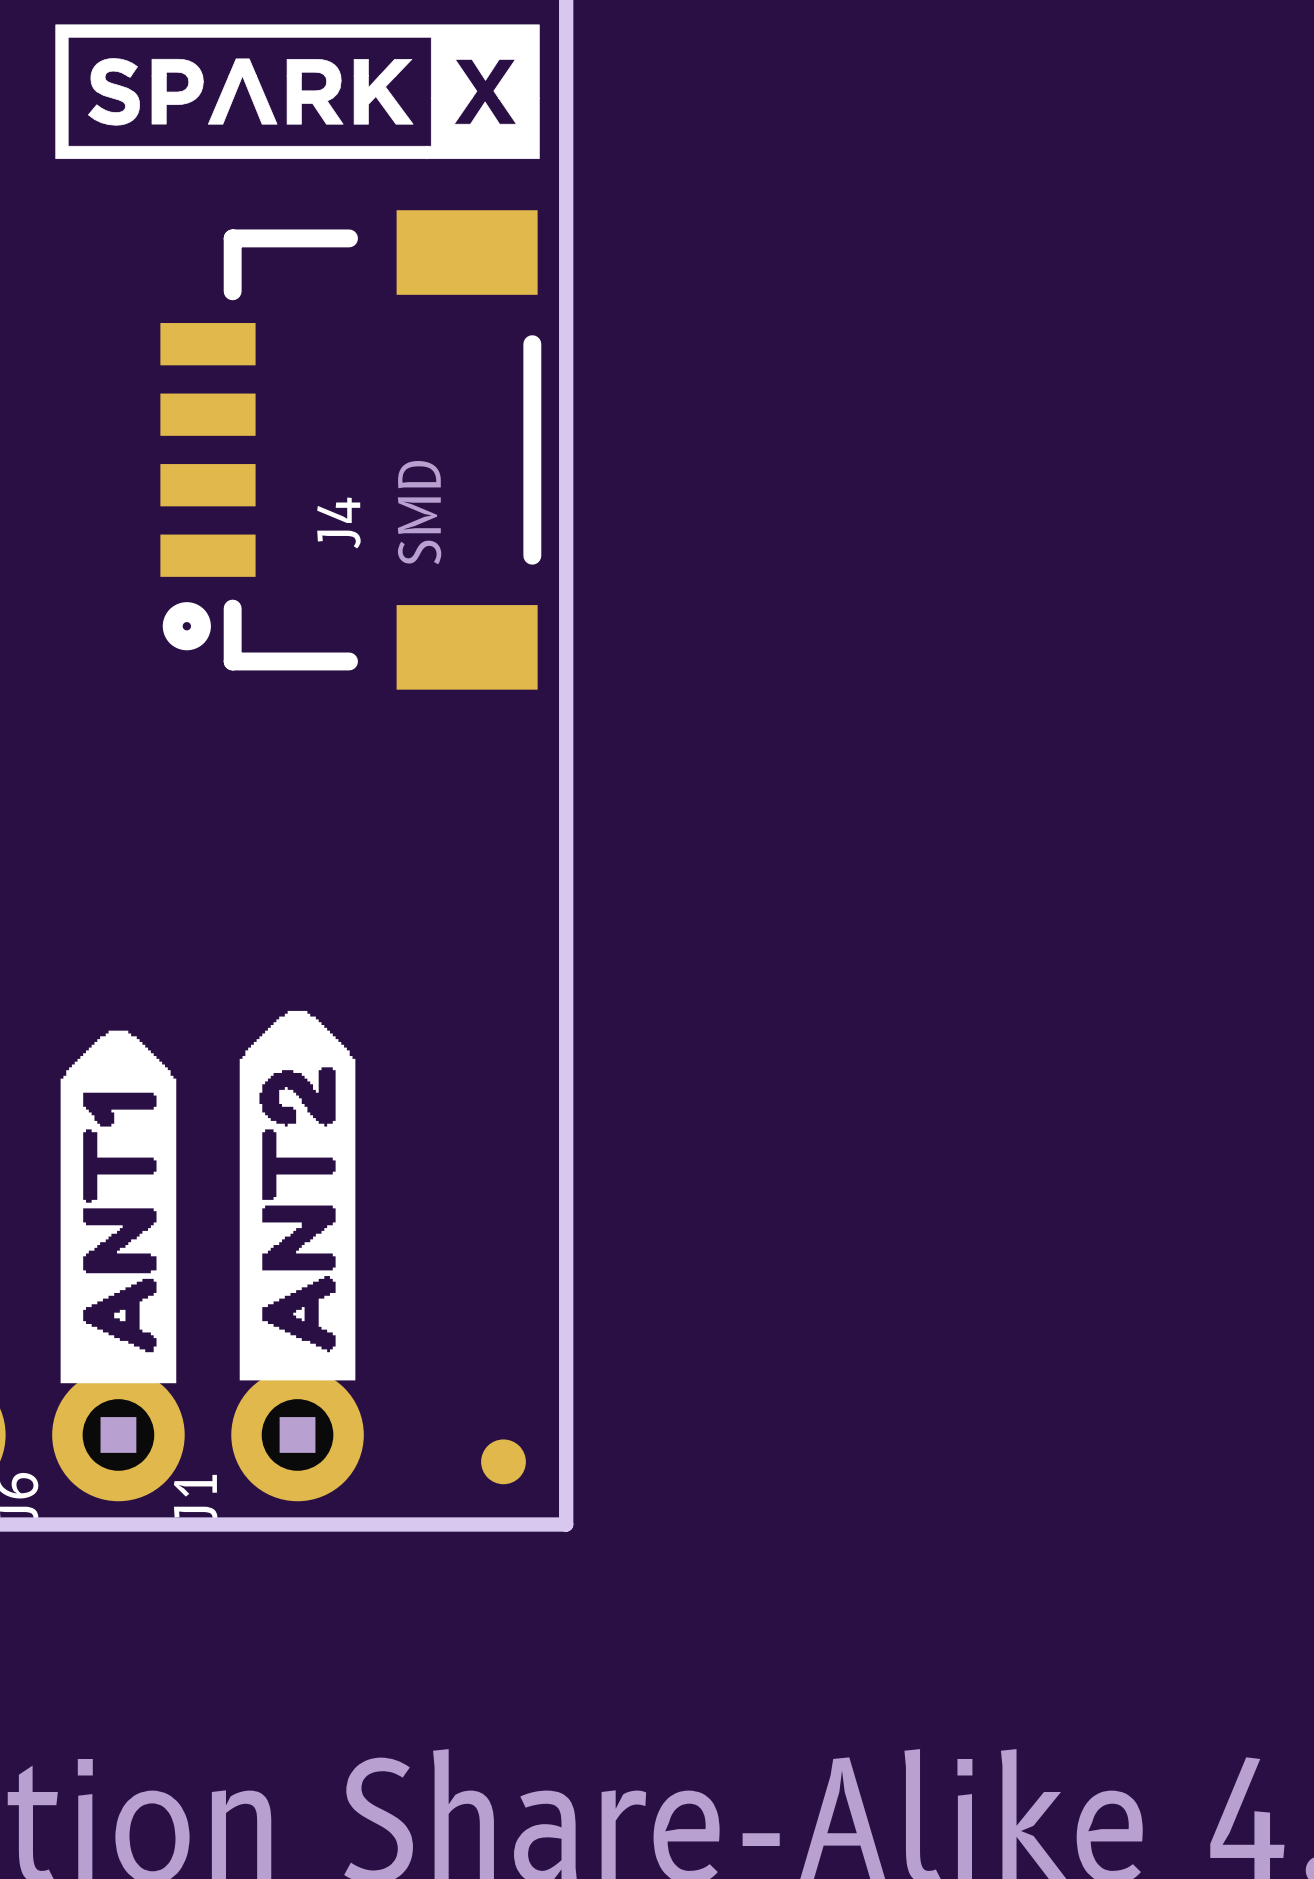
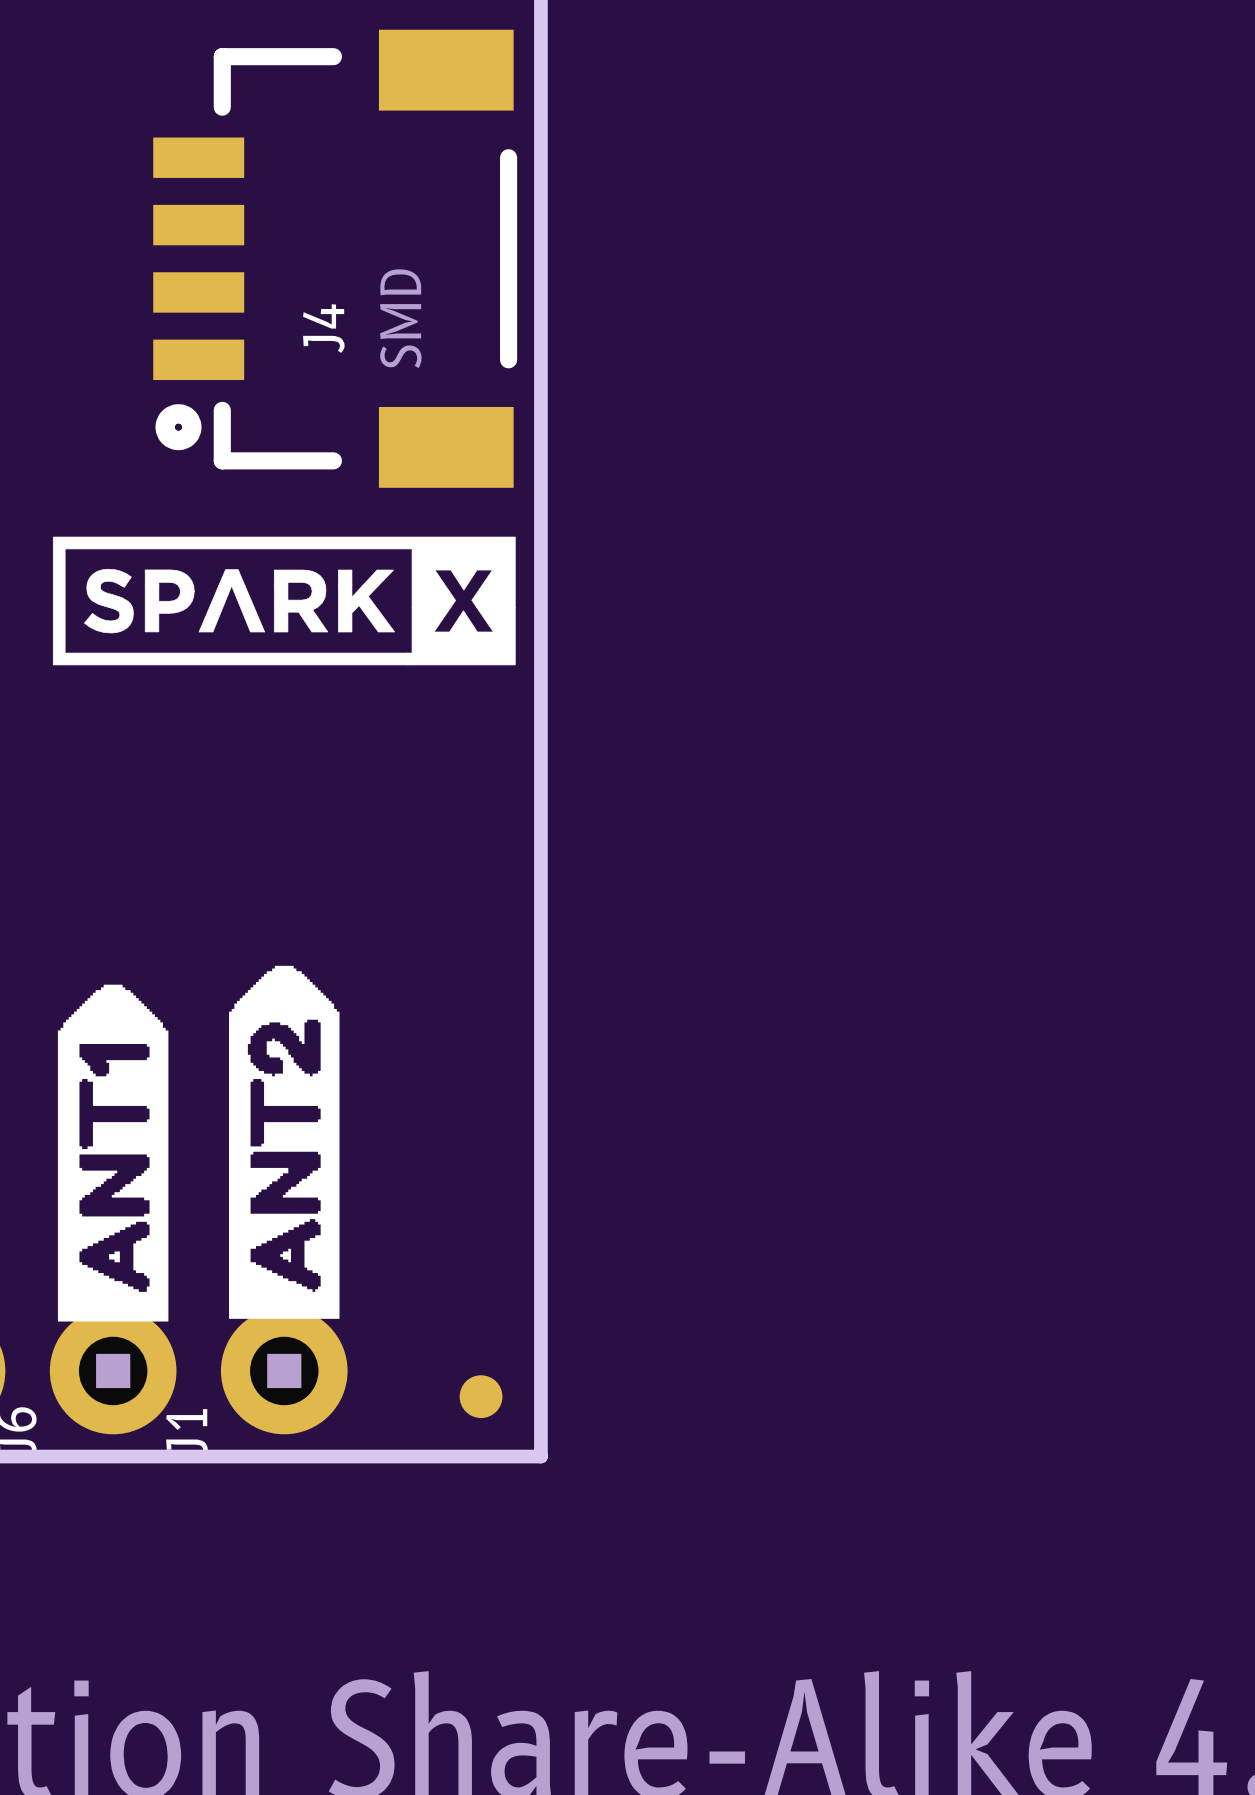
drawing position: (297, 91) -> (284, 600)
J4 position: (350, 449) -> (335, 258)

